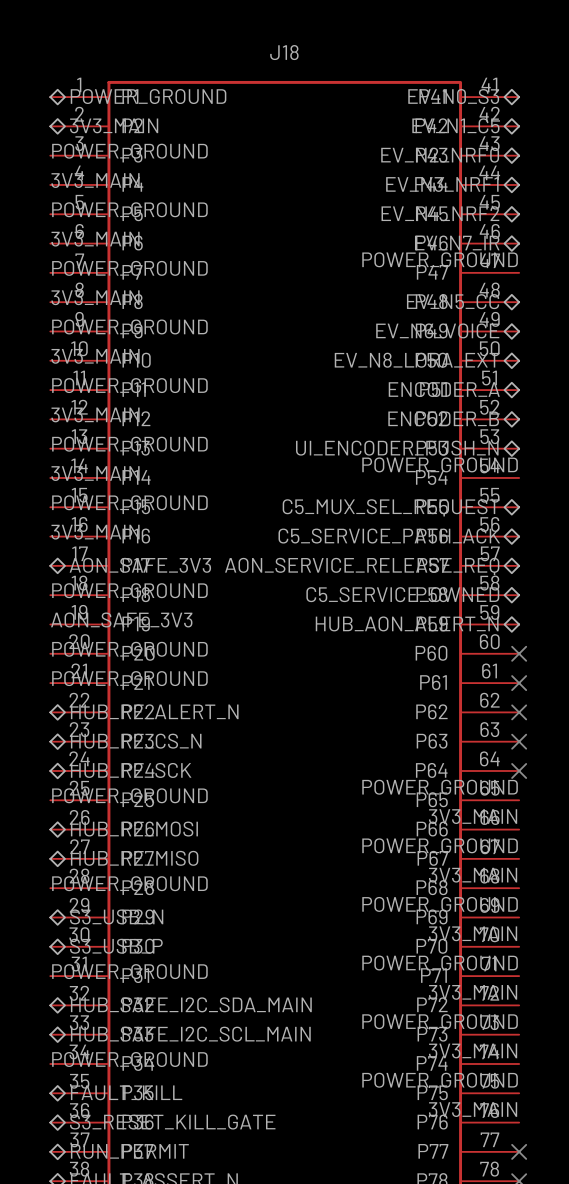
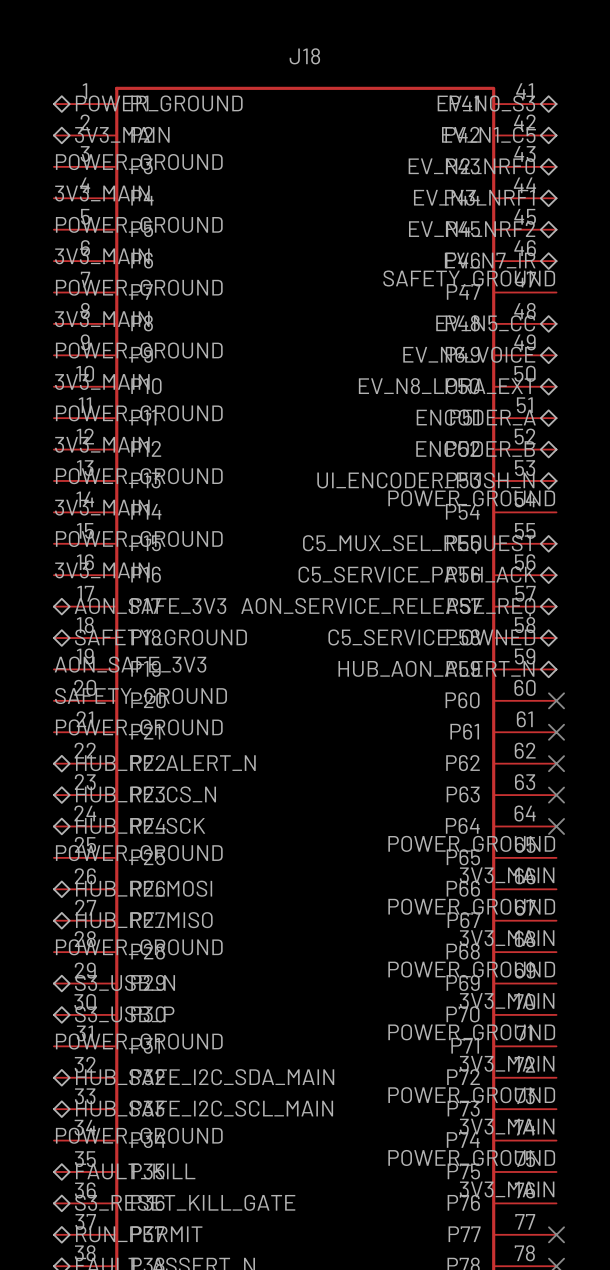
label: POWER_GROUND (440, 259) -> SAFETY_GROUND (469, 278)
label: POWER_GROUND (129, 590) -> none
hierarchical label: none -> SAFETY_GROUND (160, 637)
label: POWER_GROUND (129, 649) -> SAFETY_GROUND (141, 696)

